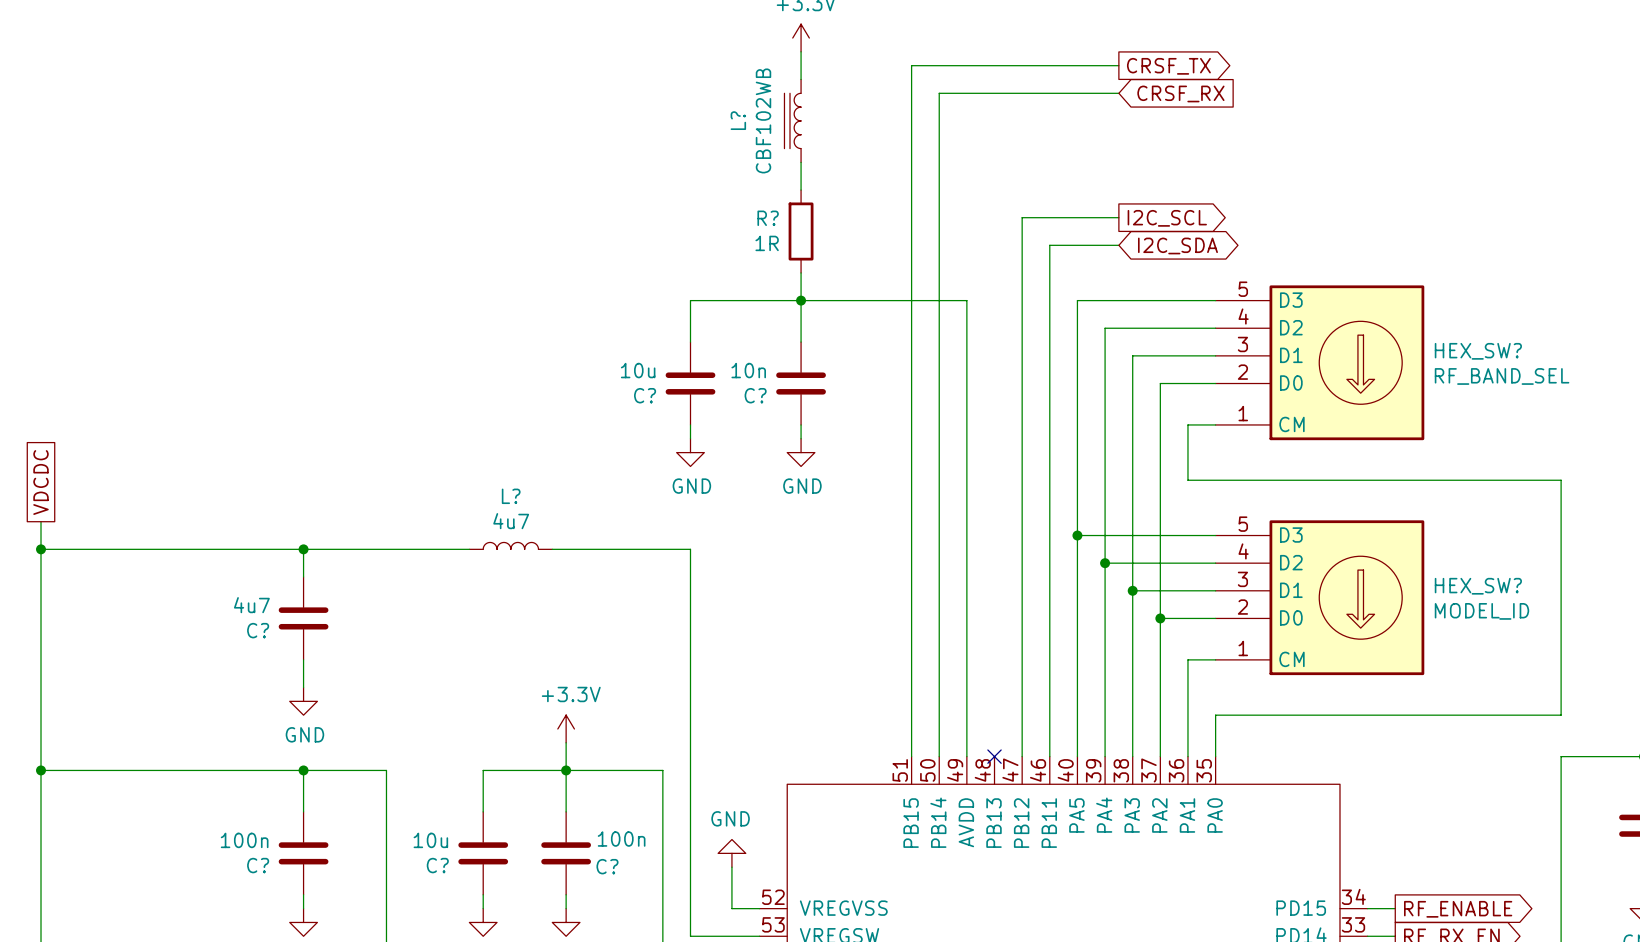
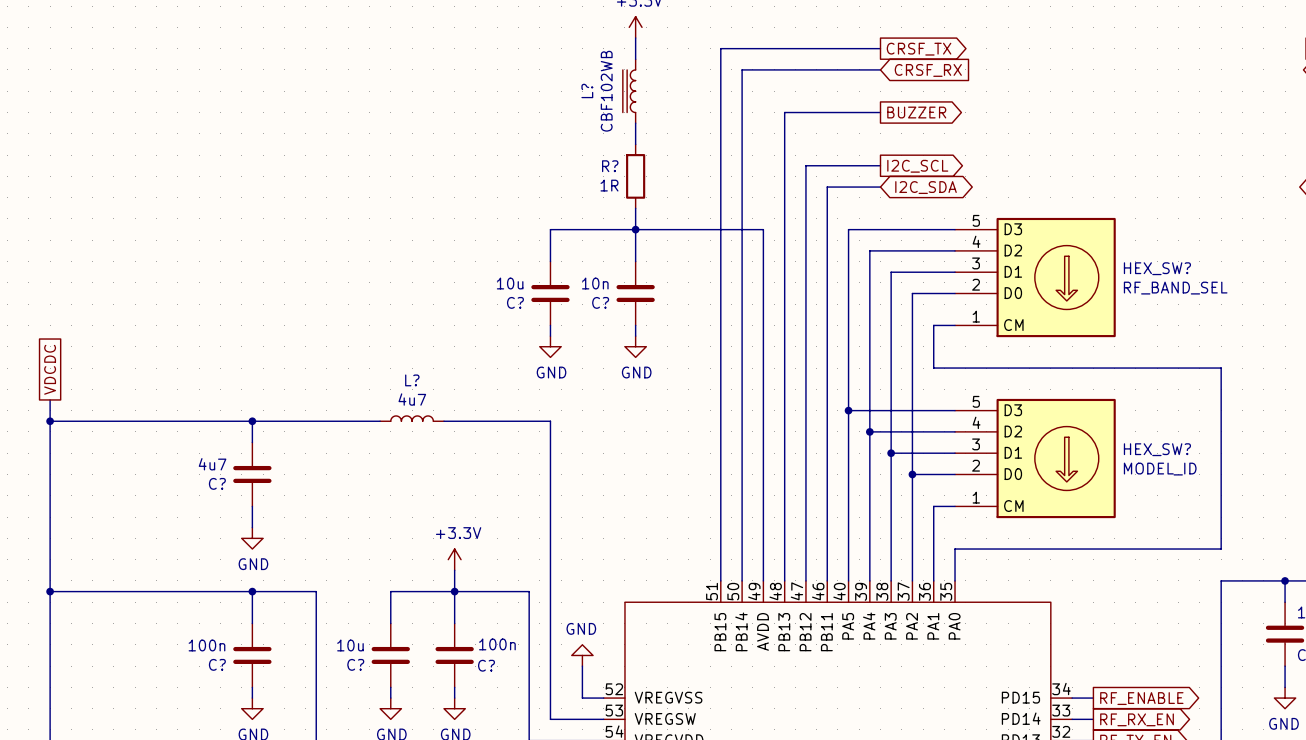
wire: none -> (880, 112) (784, 112) (784, 580)
global label: none -> BUZZER (916, 112)
no-connect mark: (994, 756) -> none

